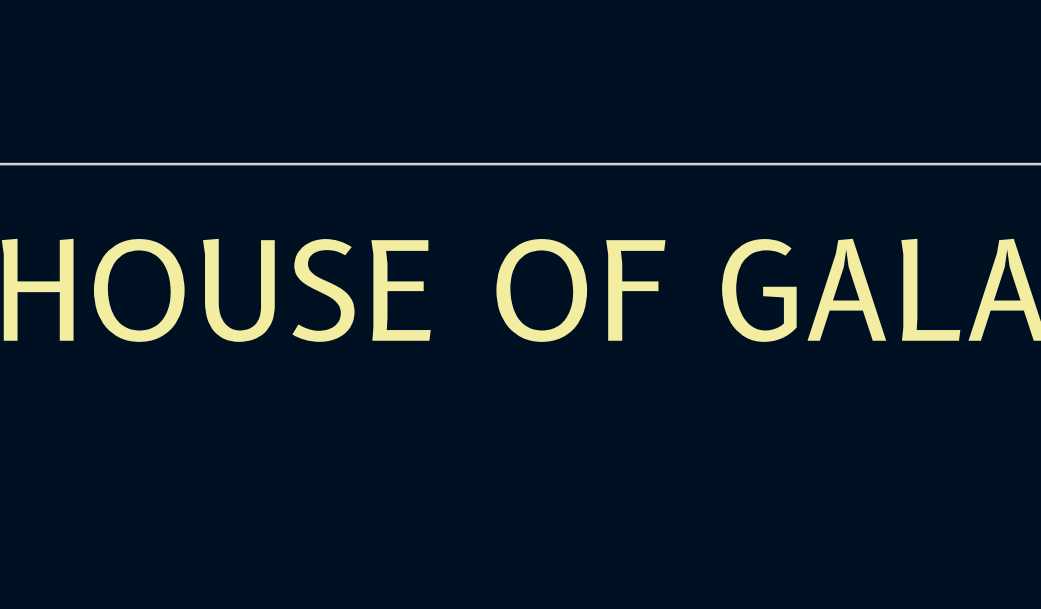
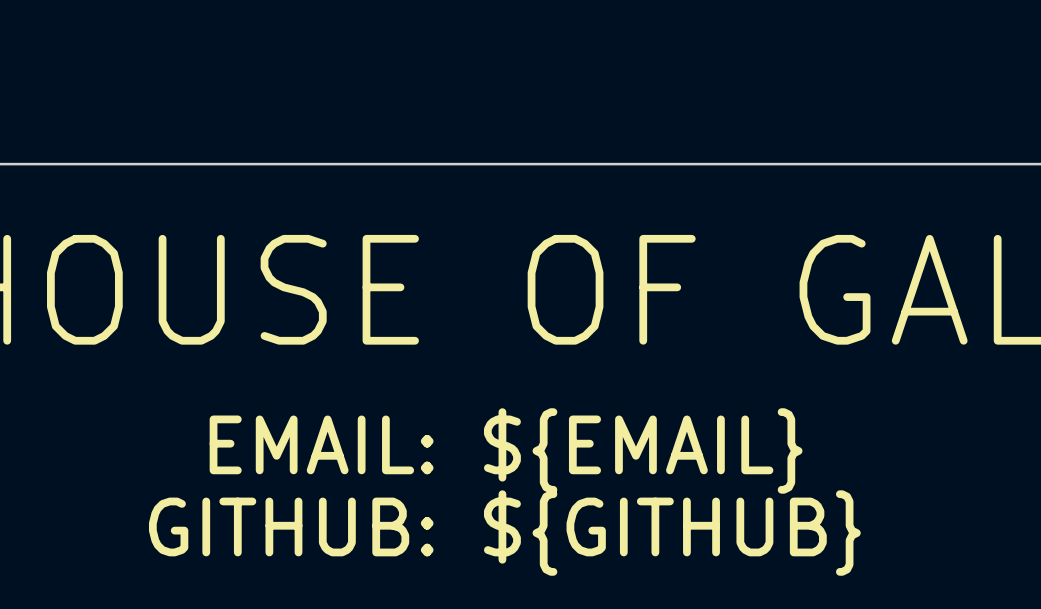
text: none -> EMAIL: ${EMAIL} (506, 450)
text: none -> GITHUB: ${GITHUB} (504, 533)

